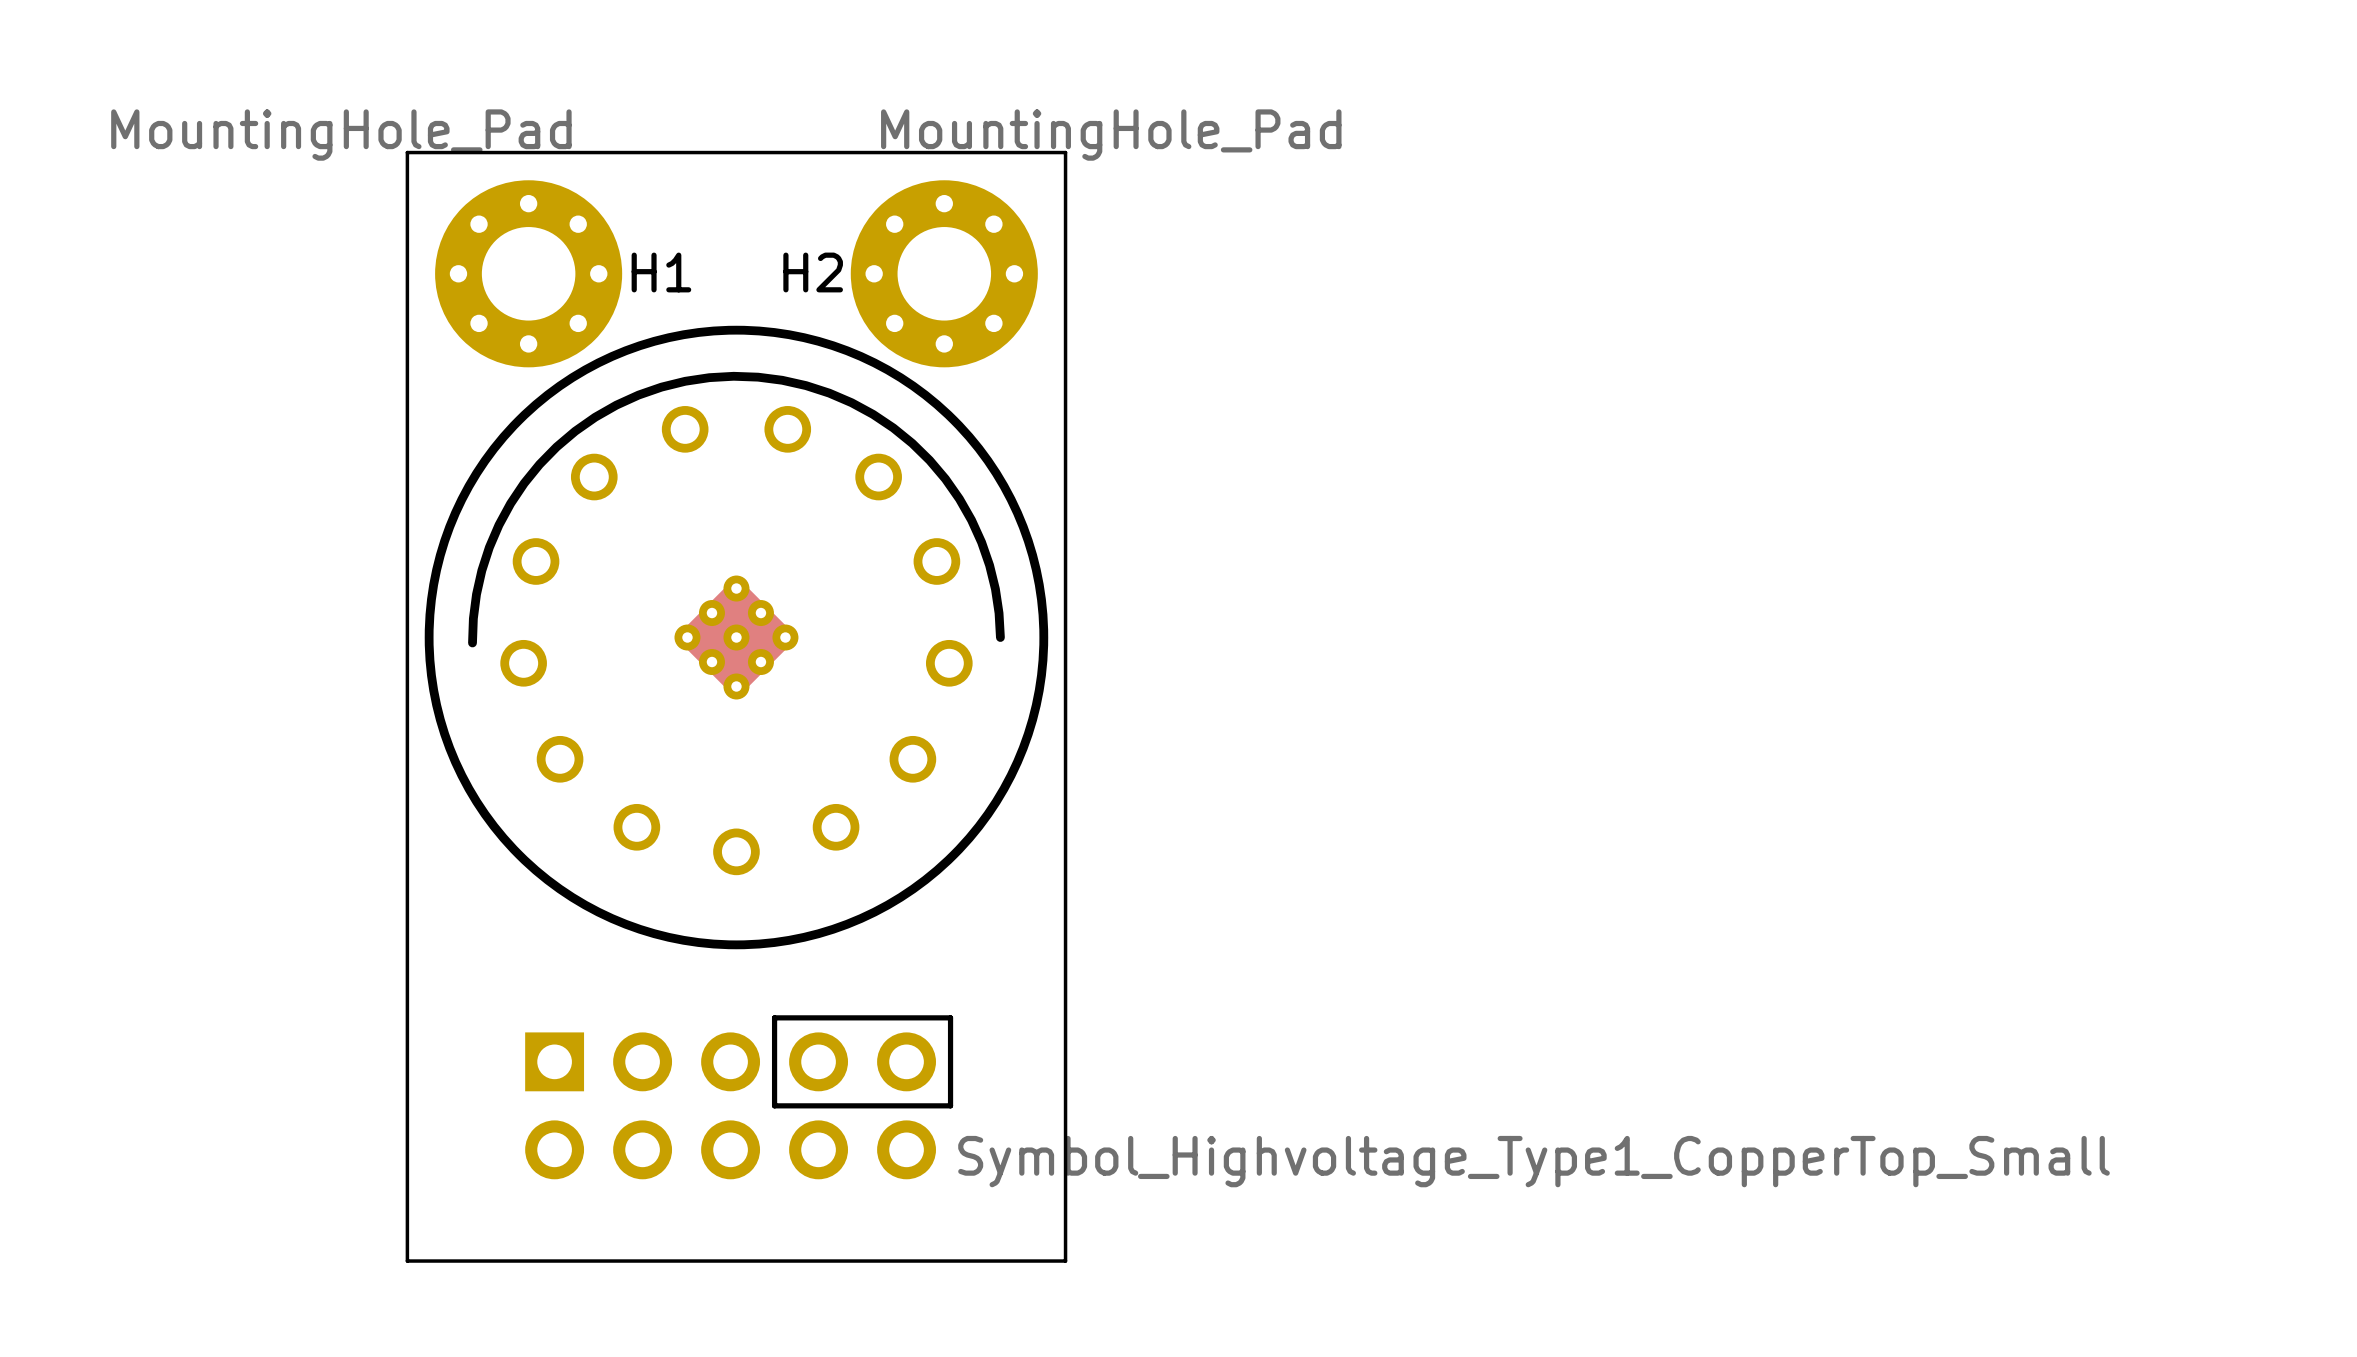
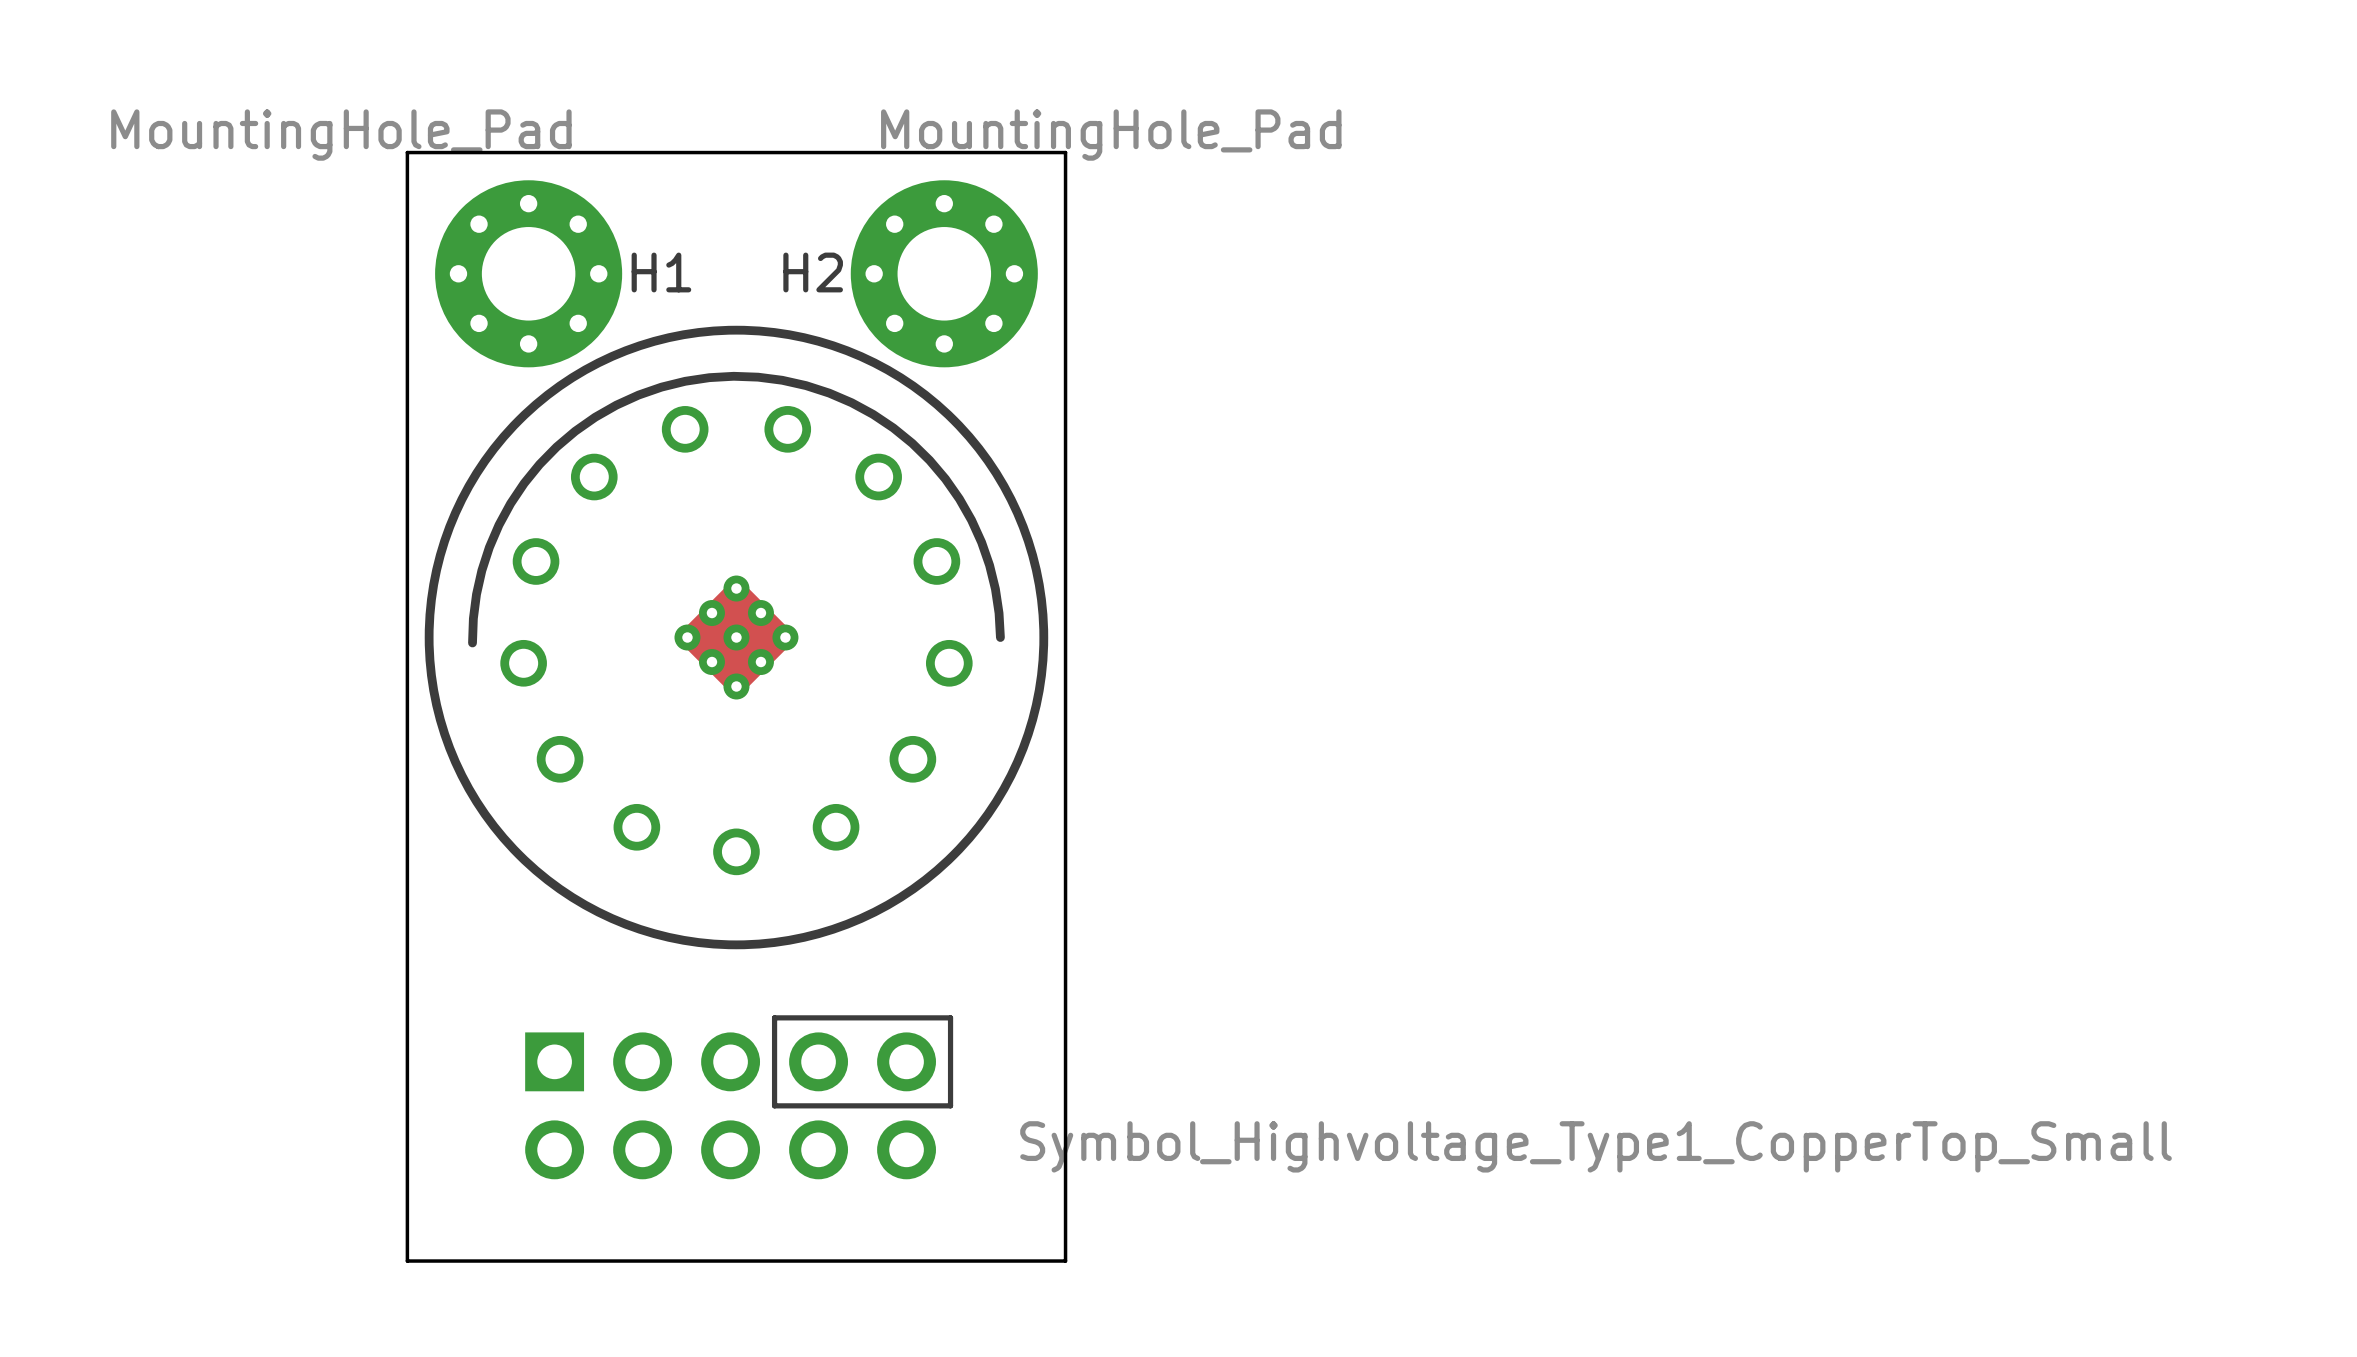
drawing position: (1534, 1161) -> (1596, 1146)

